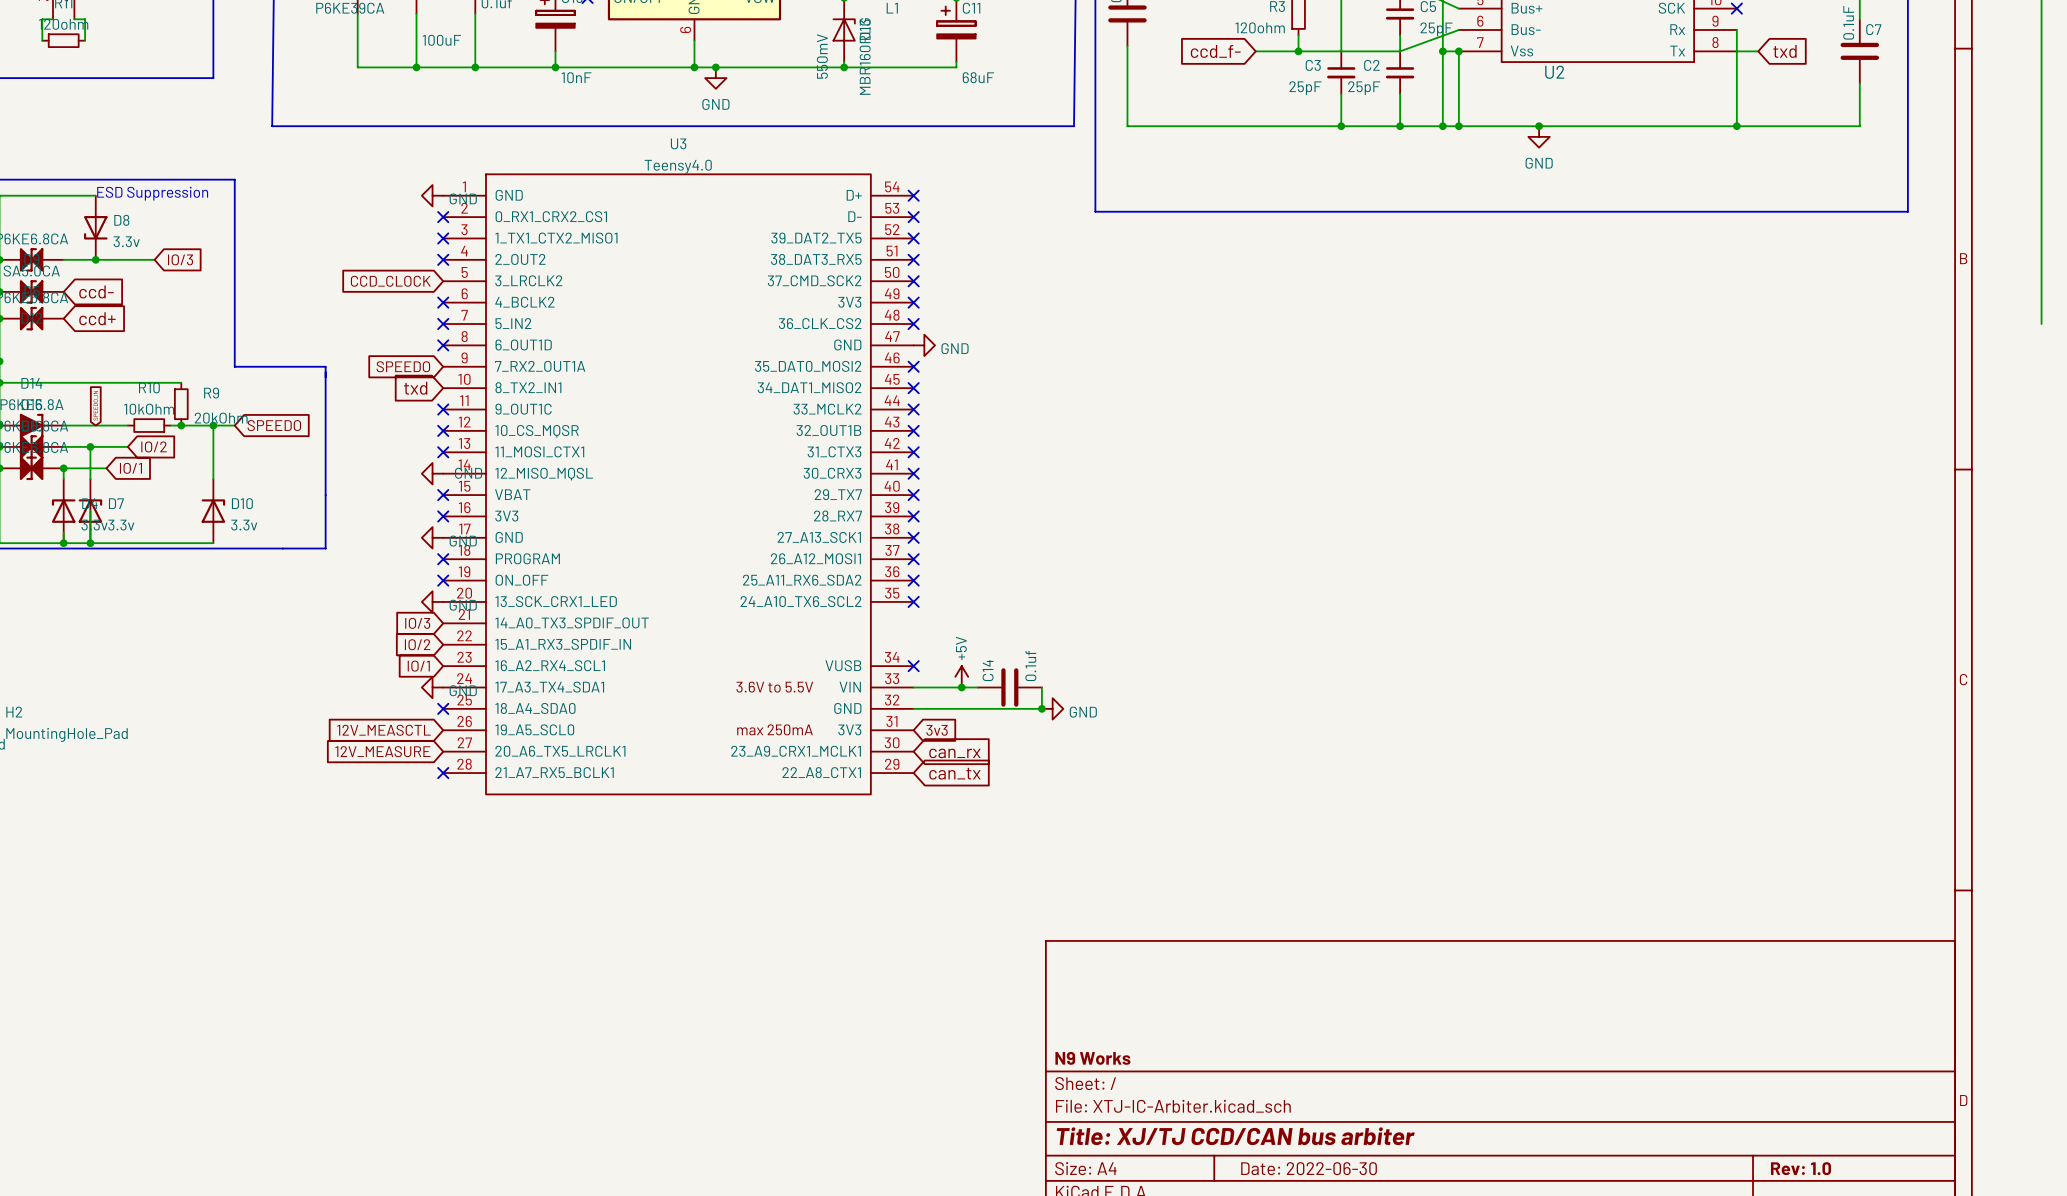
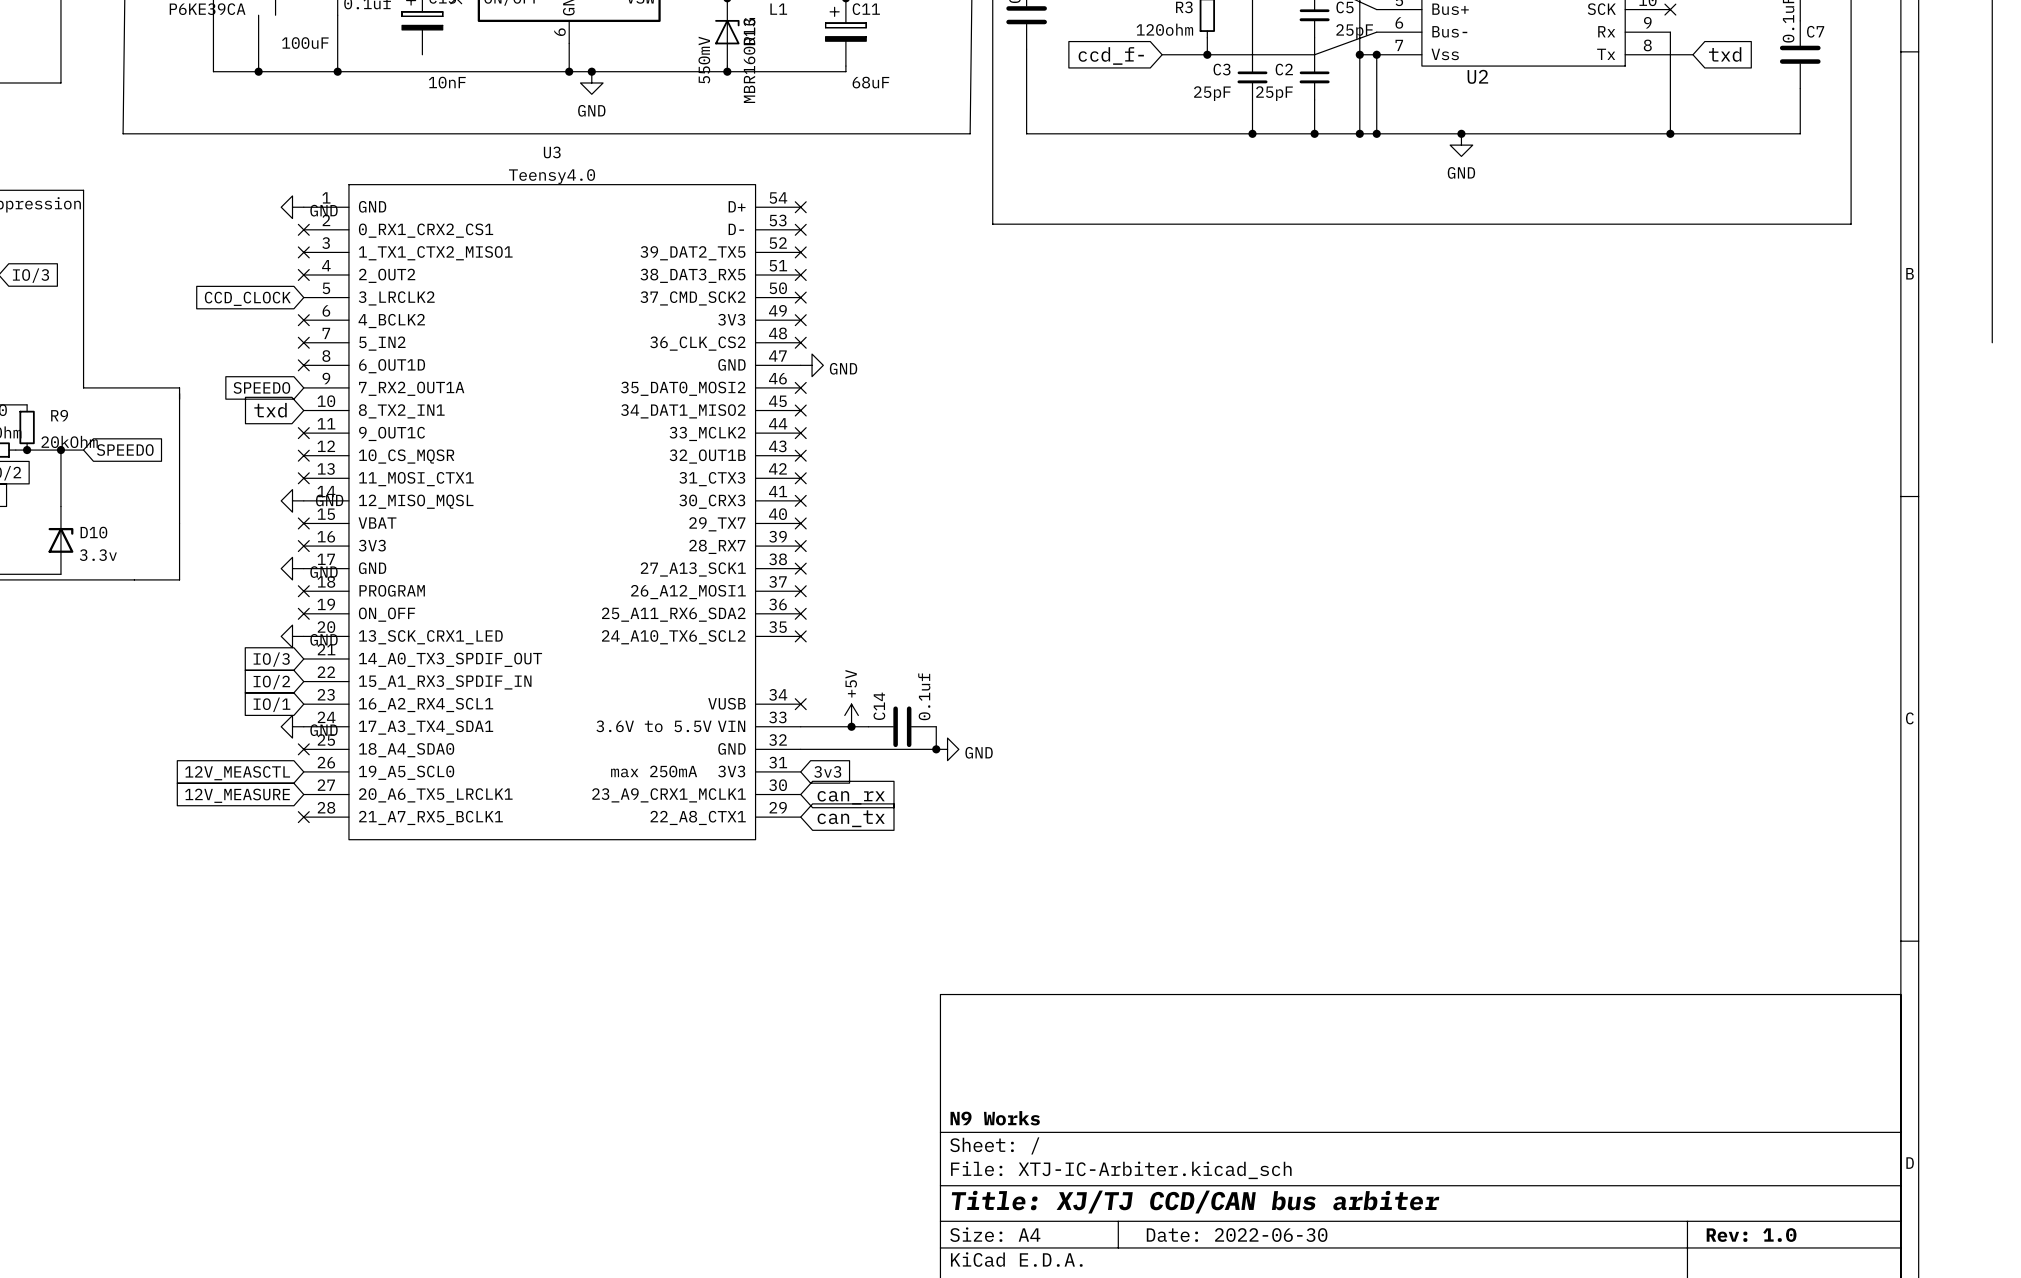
wire: (416, 13) (416, 67) -> (258, 15) (258, 71)
wire: (555, 51) (555, 67) -> none
junction position: (416, 67) -> (258, 71)
junction: (555, 67) -> none

